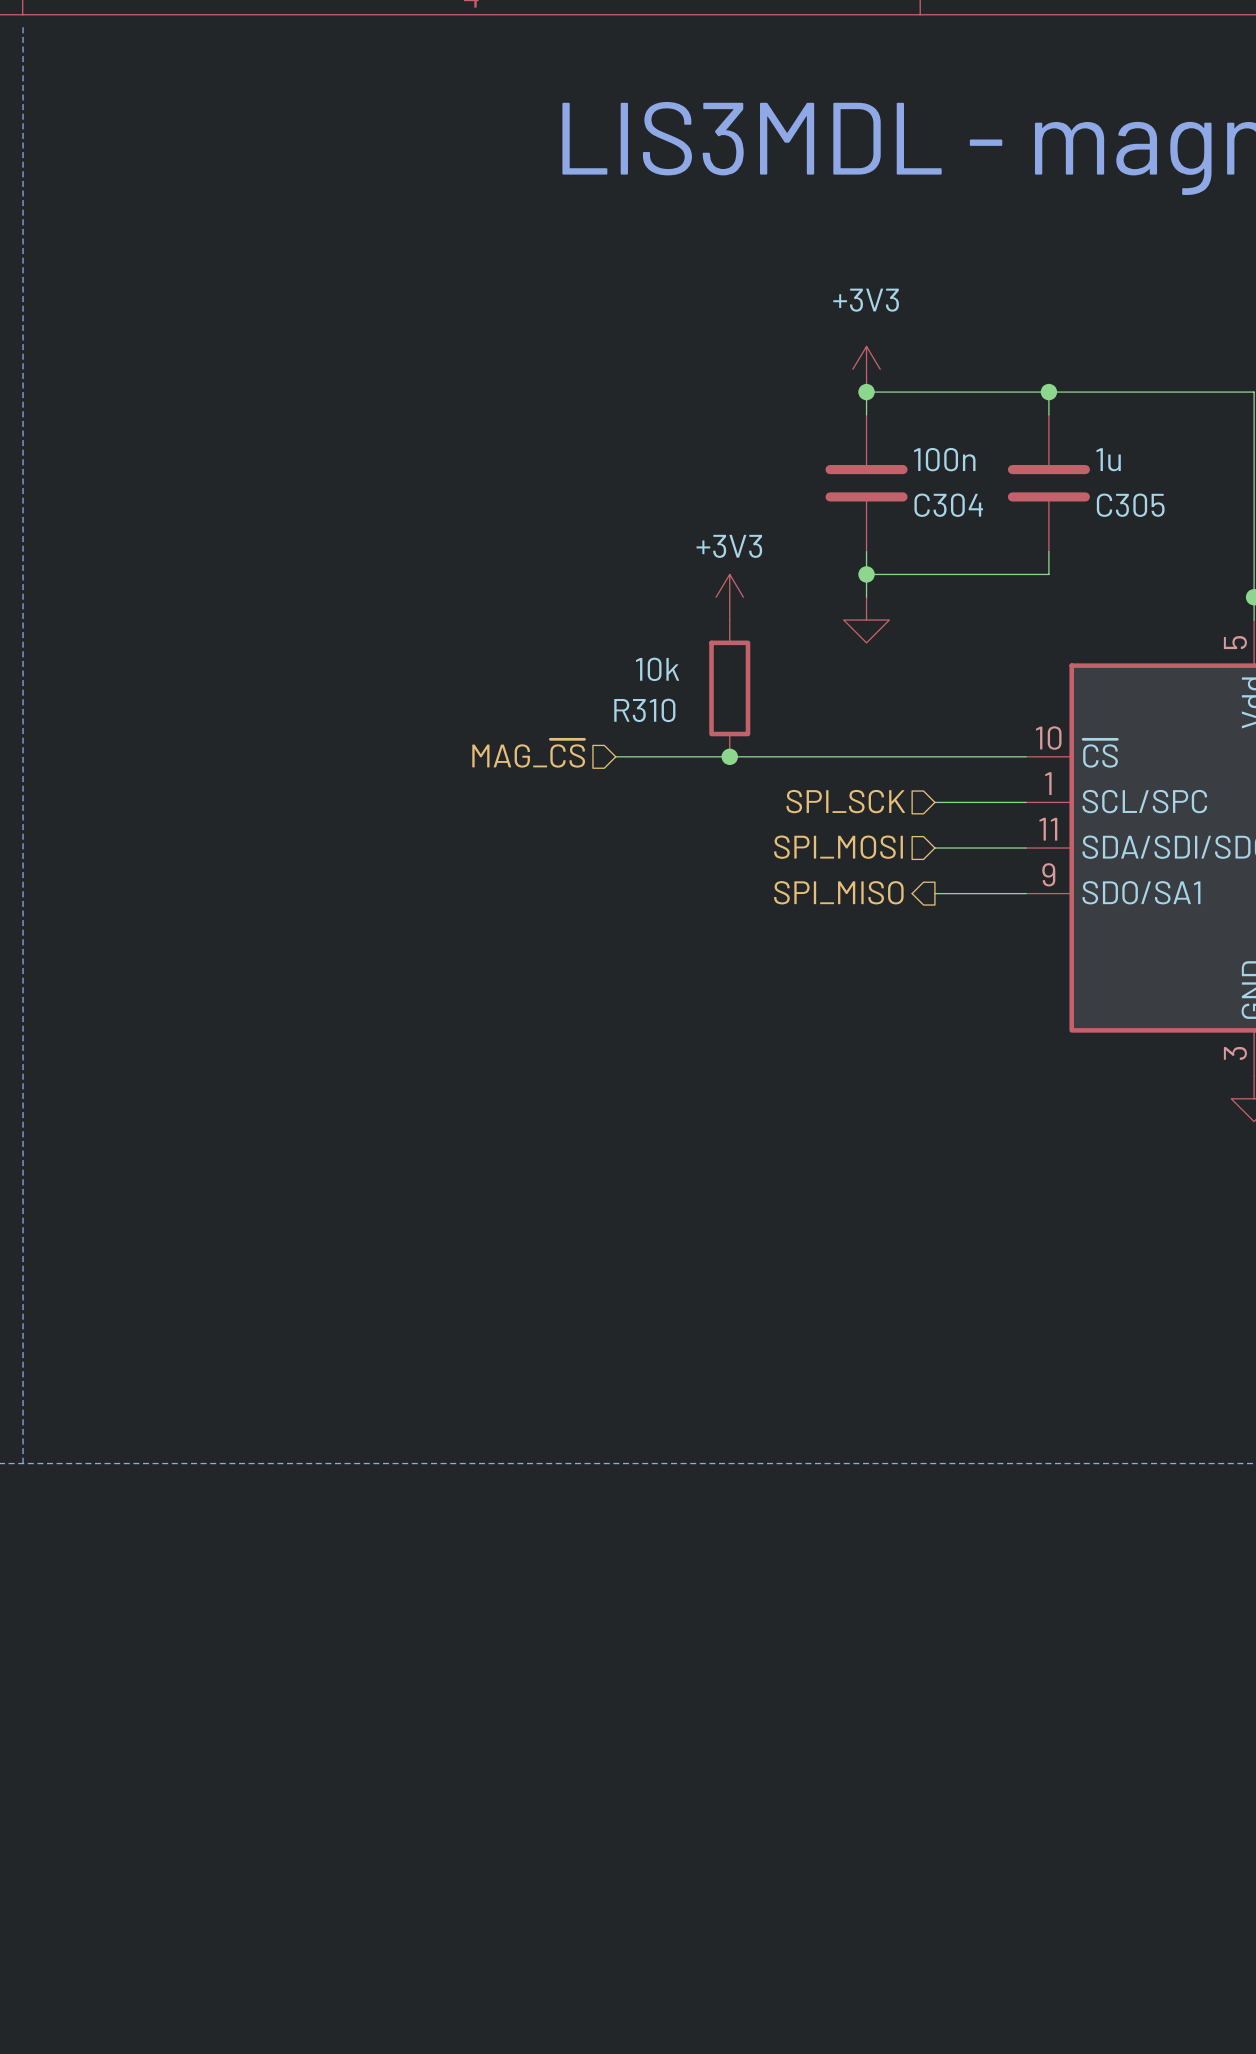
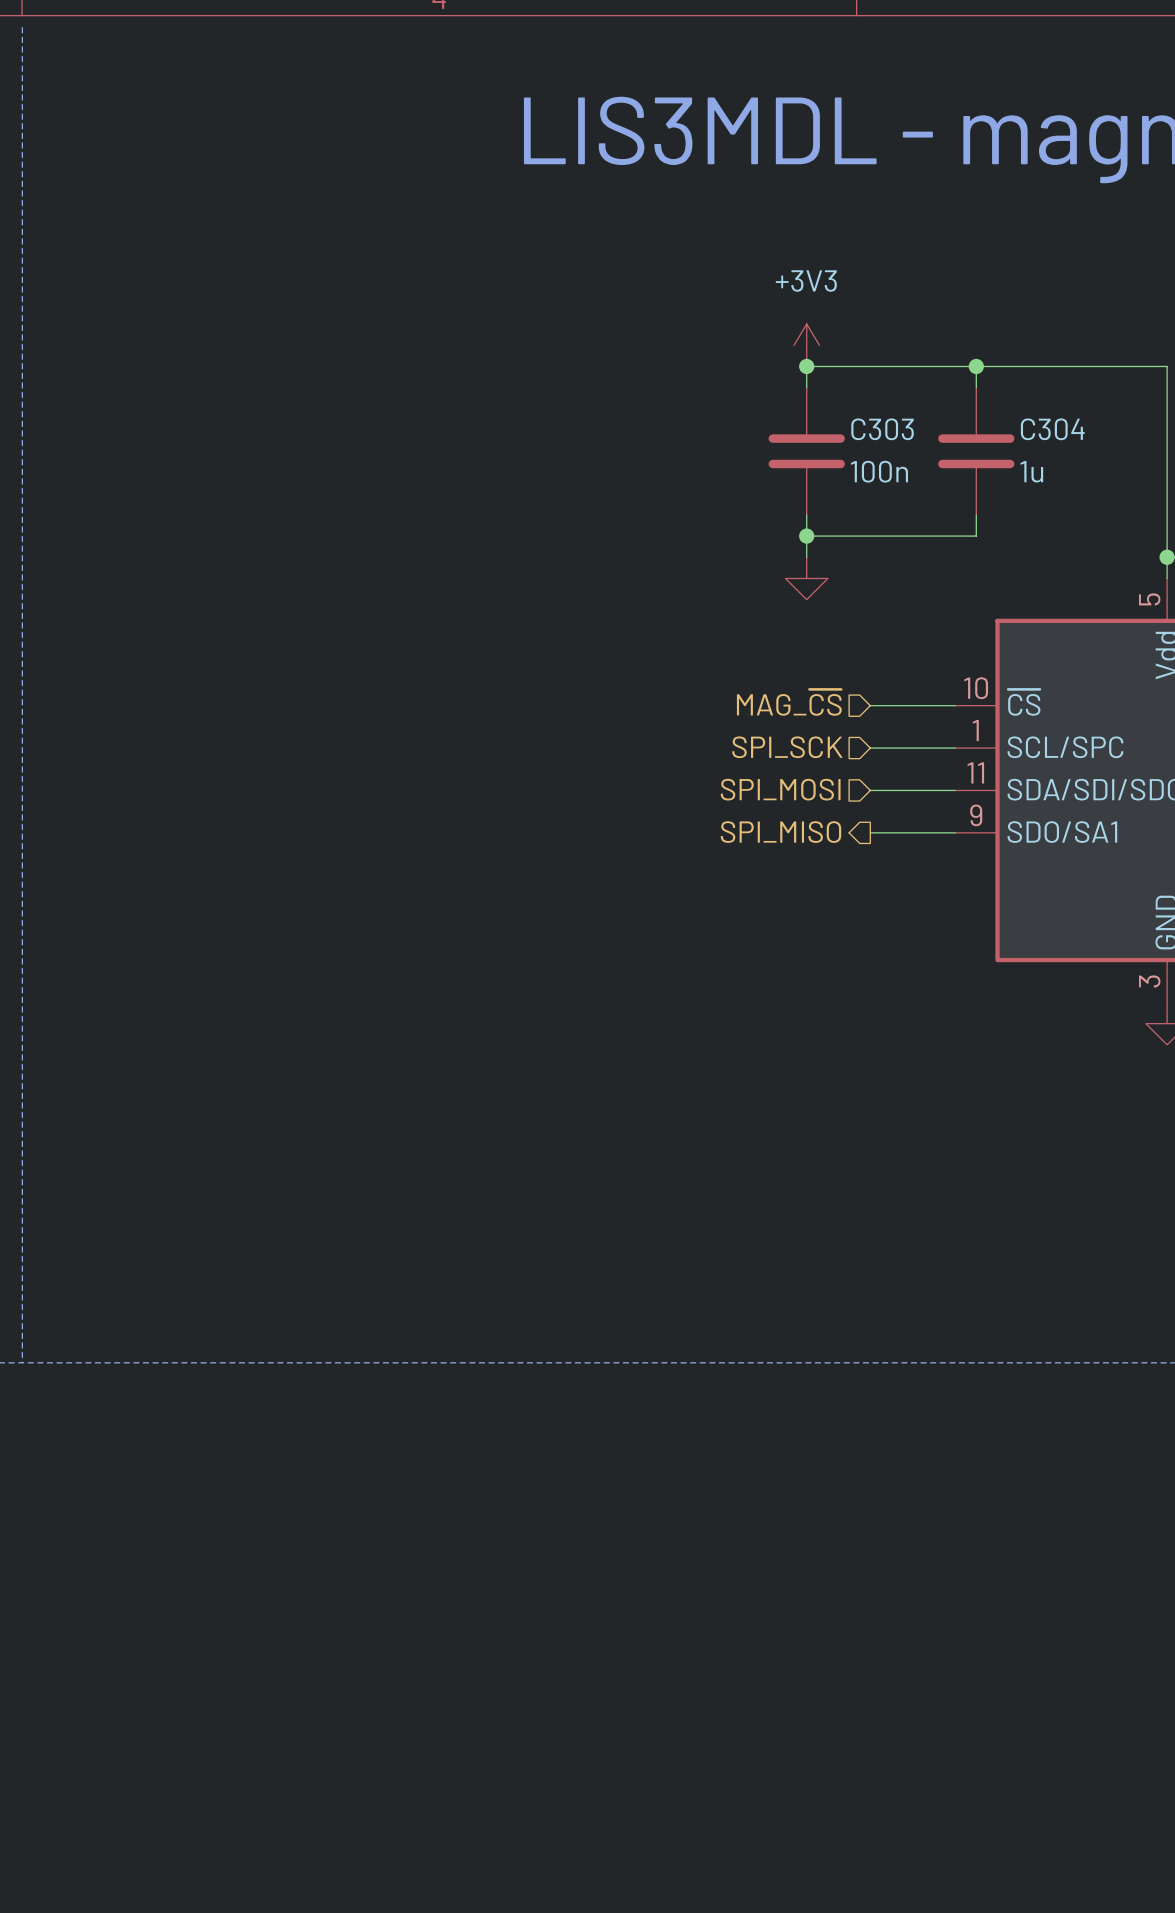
C304 value position: 100n (944, 459) -> 100n (879, 471)
C305 value position: 1u (1108, 459) -> 1u (1031, 471)
C304 name: C304 (948, 505) -> C303 (882, 429)
C305 name: C305 (1130, 505) -> C304 (1052, 429)
power symbol: +3V3 (729, 597) -> none
R310: 10k (729, 688) -> none
hierarchical label position: MAG_~{CS} (528, 753) -> MAG_~{CS} (789, 702)
wire: (615, 756) (934, 756) -> none
junction: (729, 756) -> none

